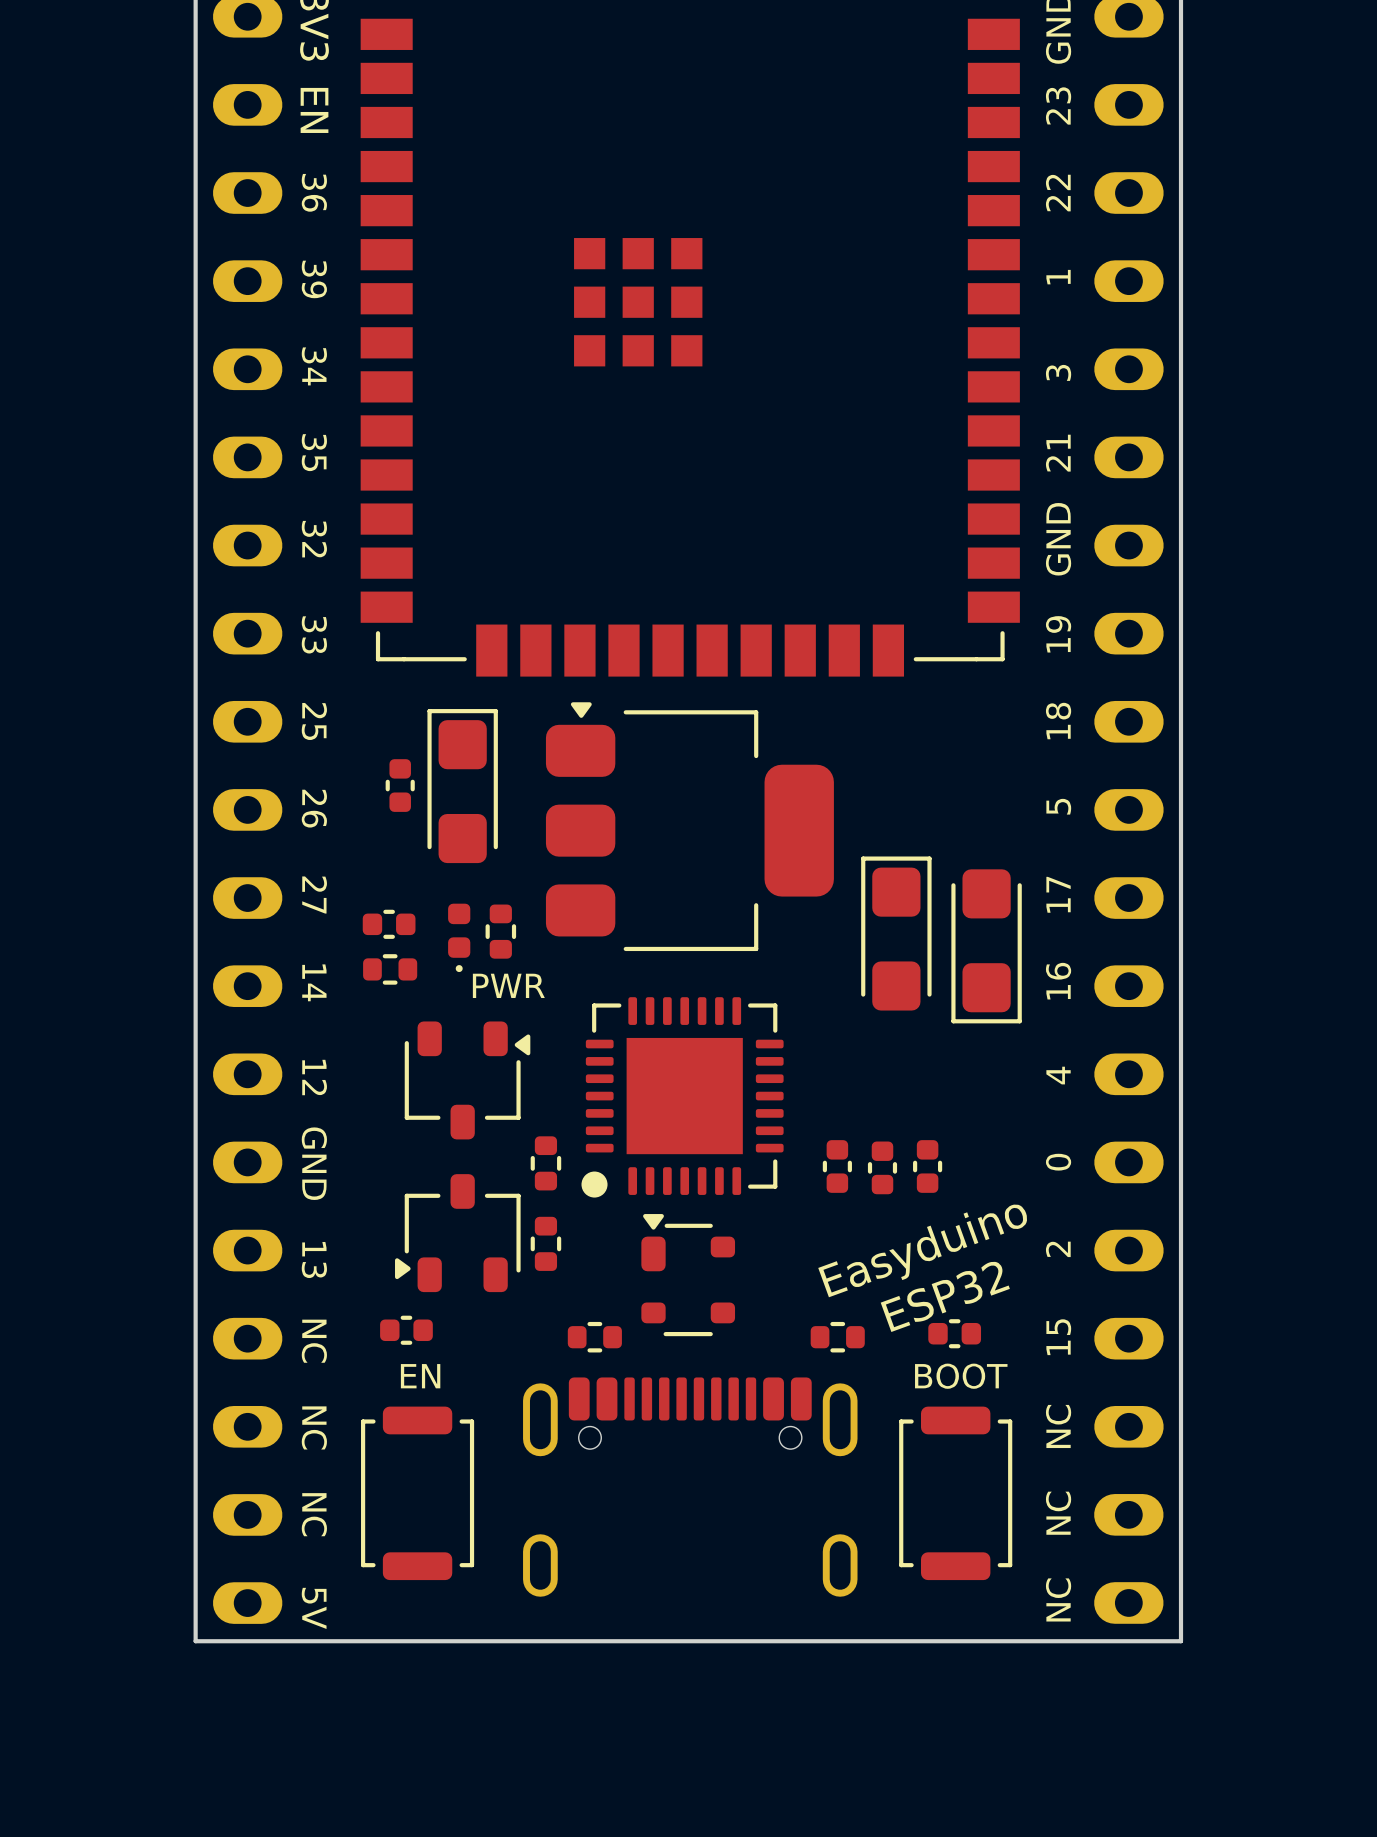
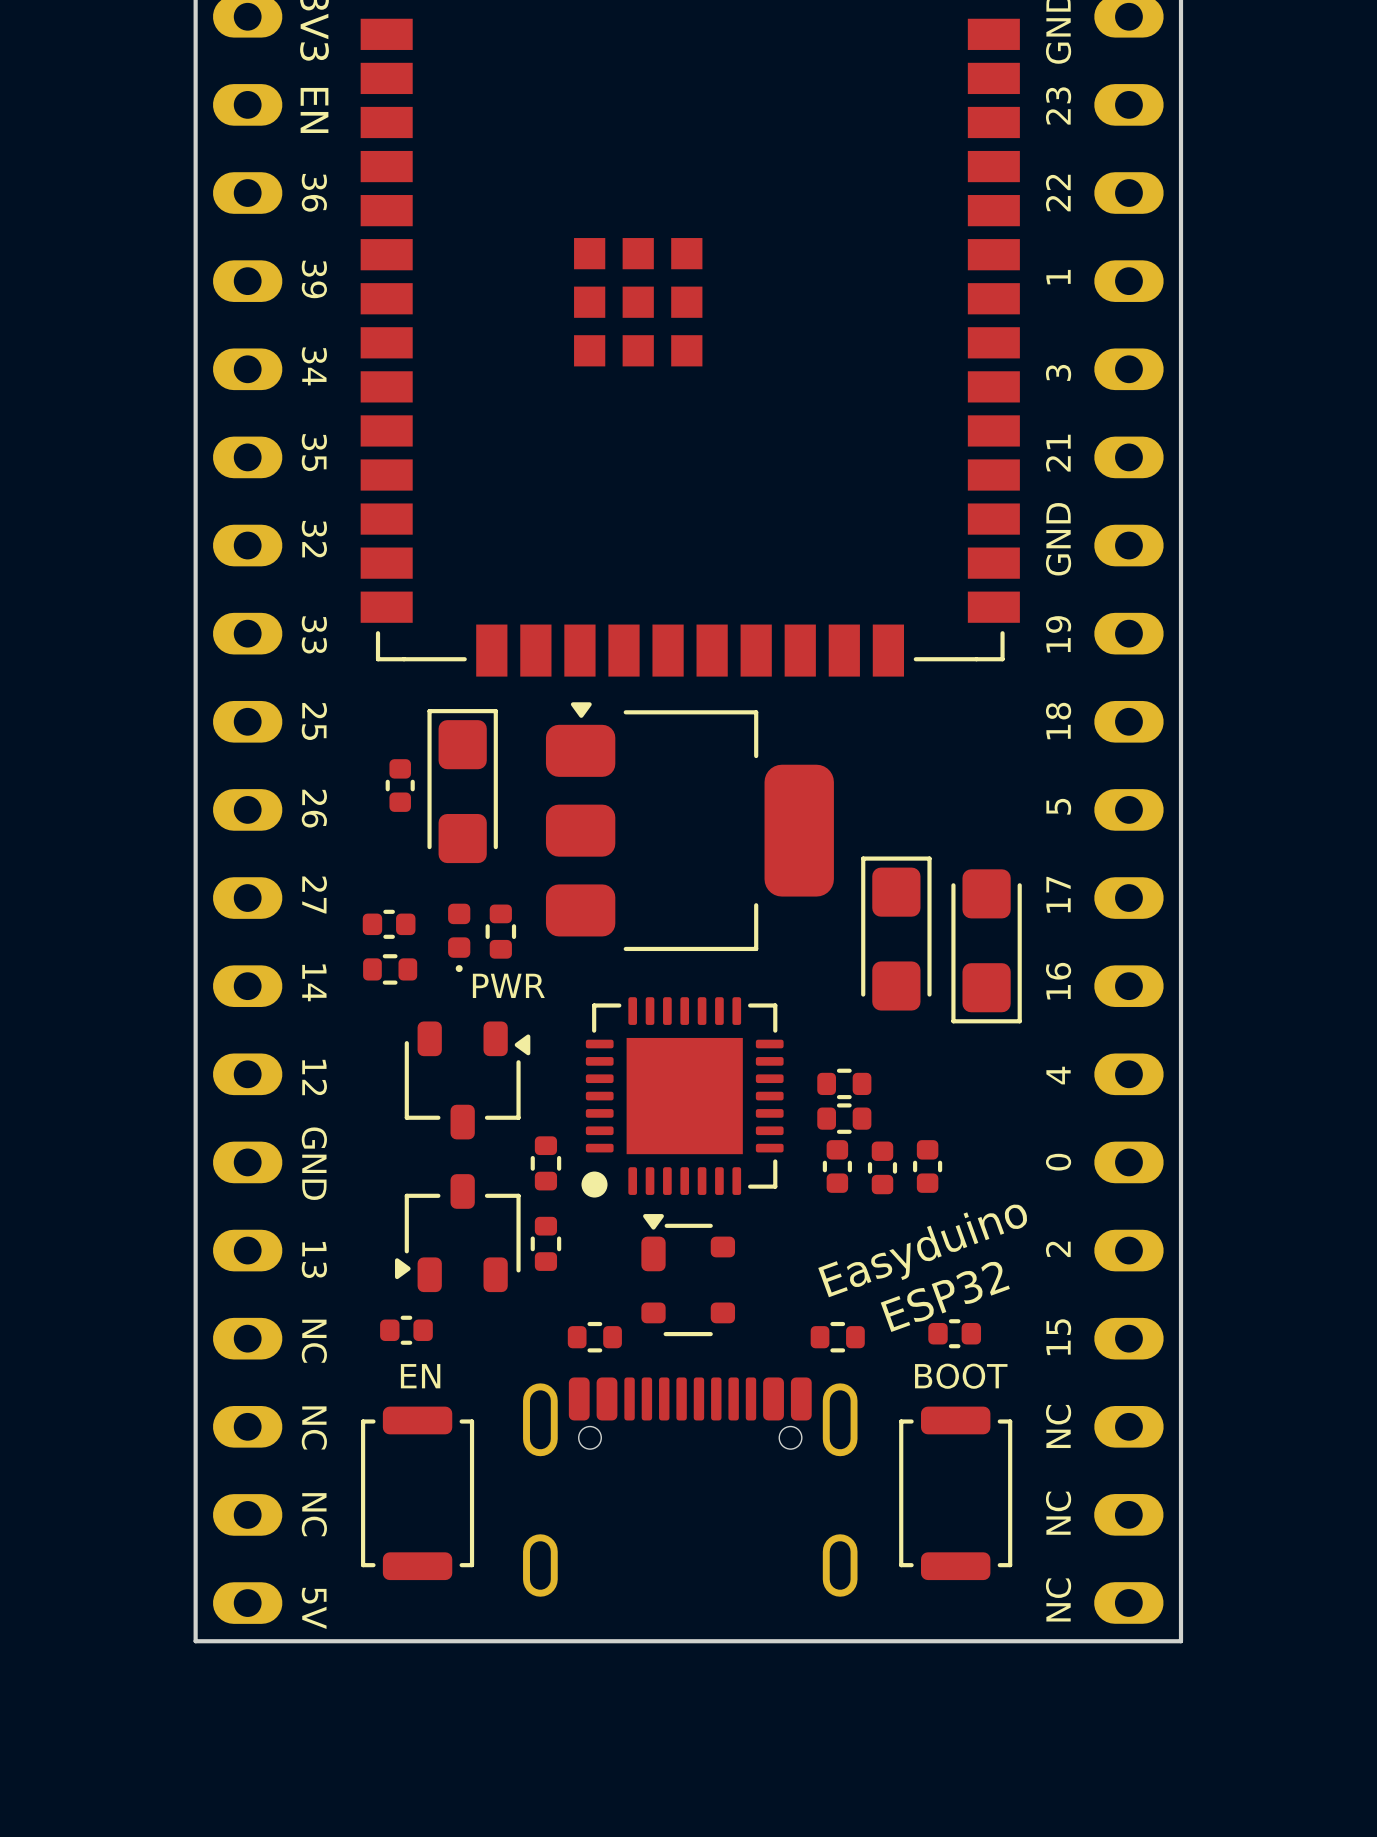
part: none -> (844, 1083)
part: none -> (844, 1118)

